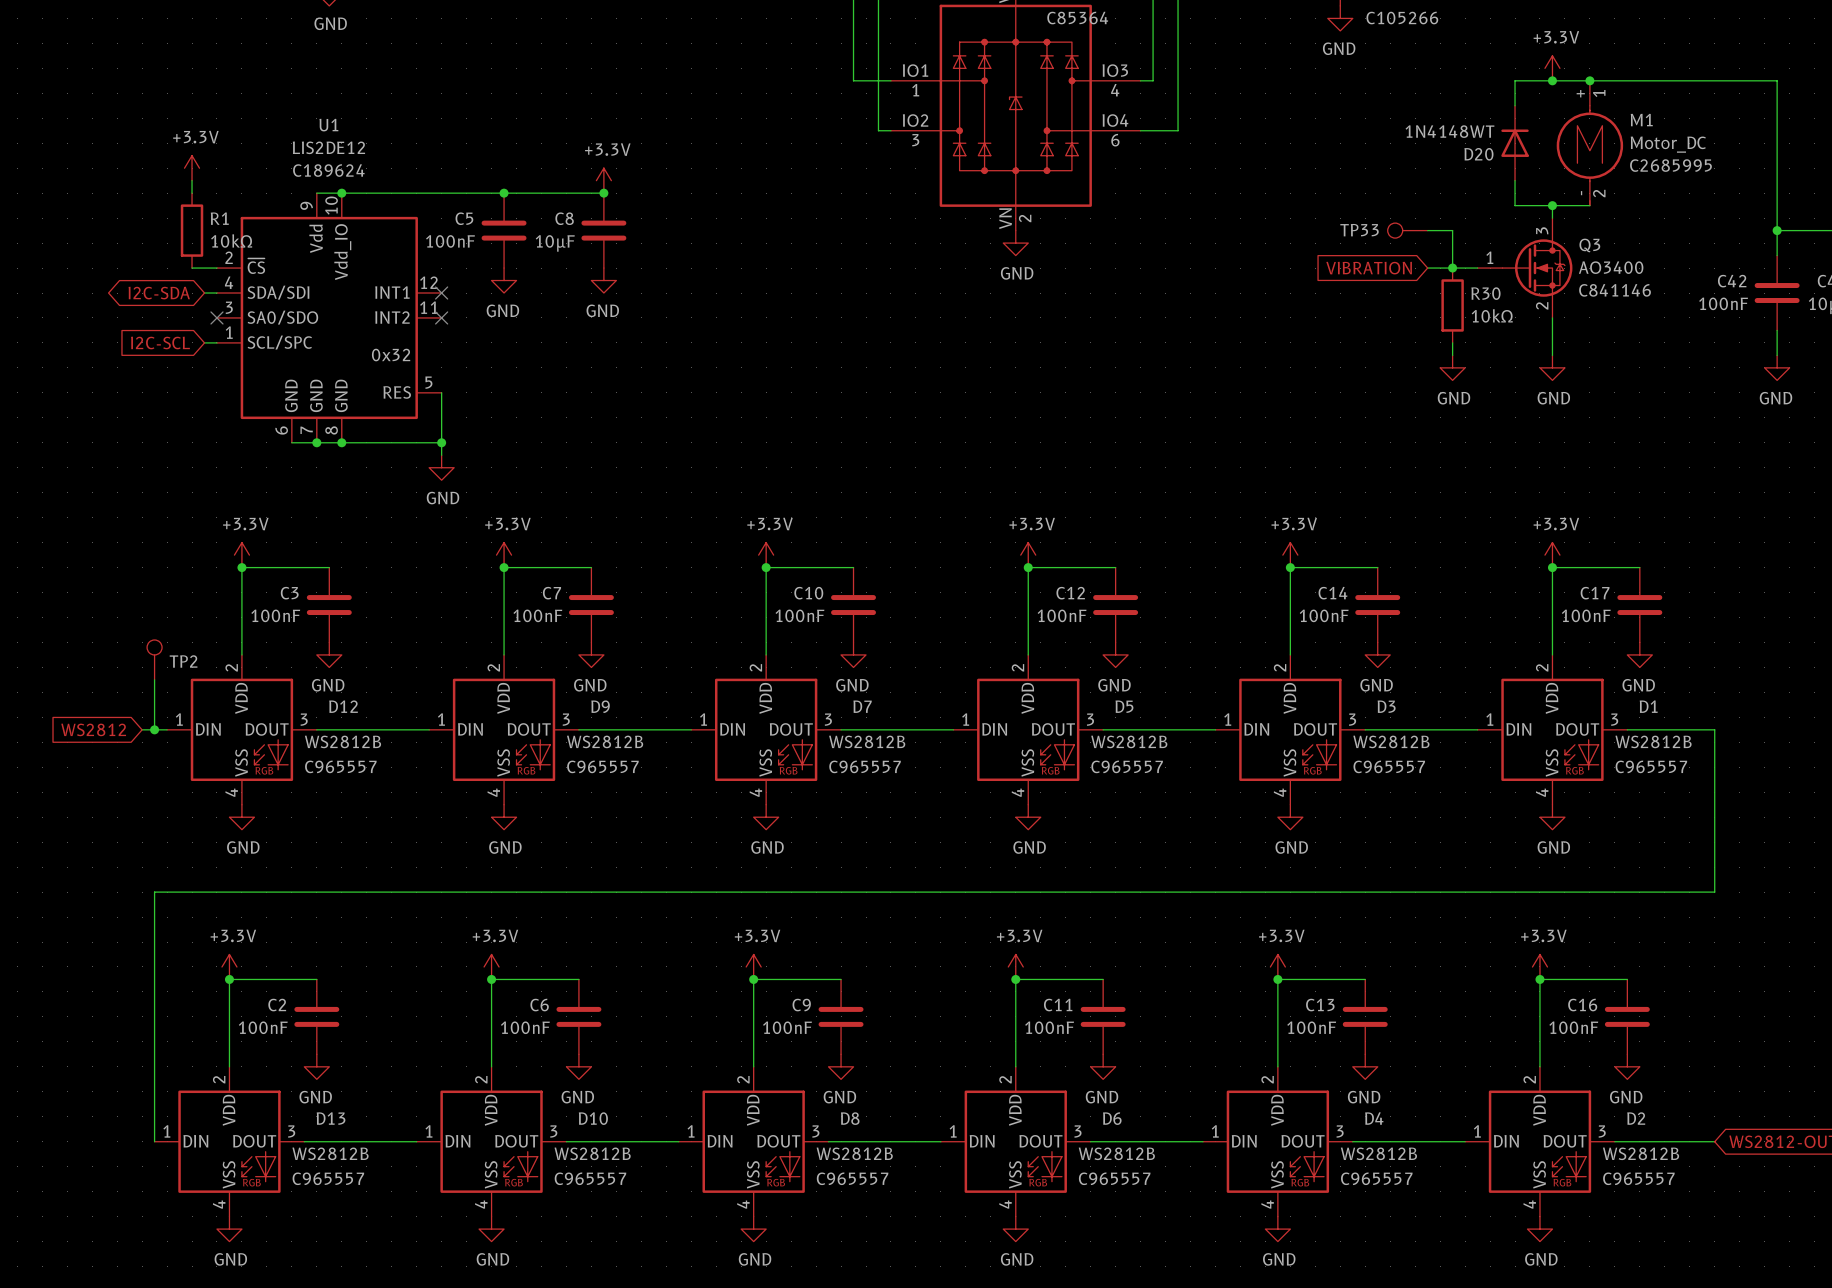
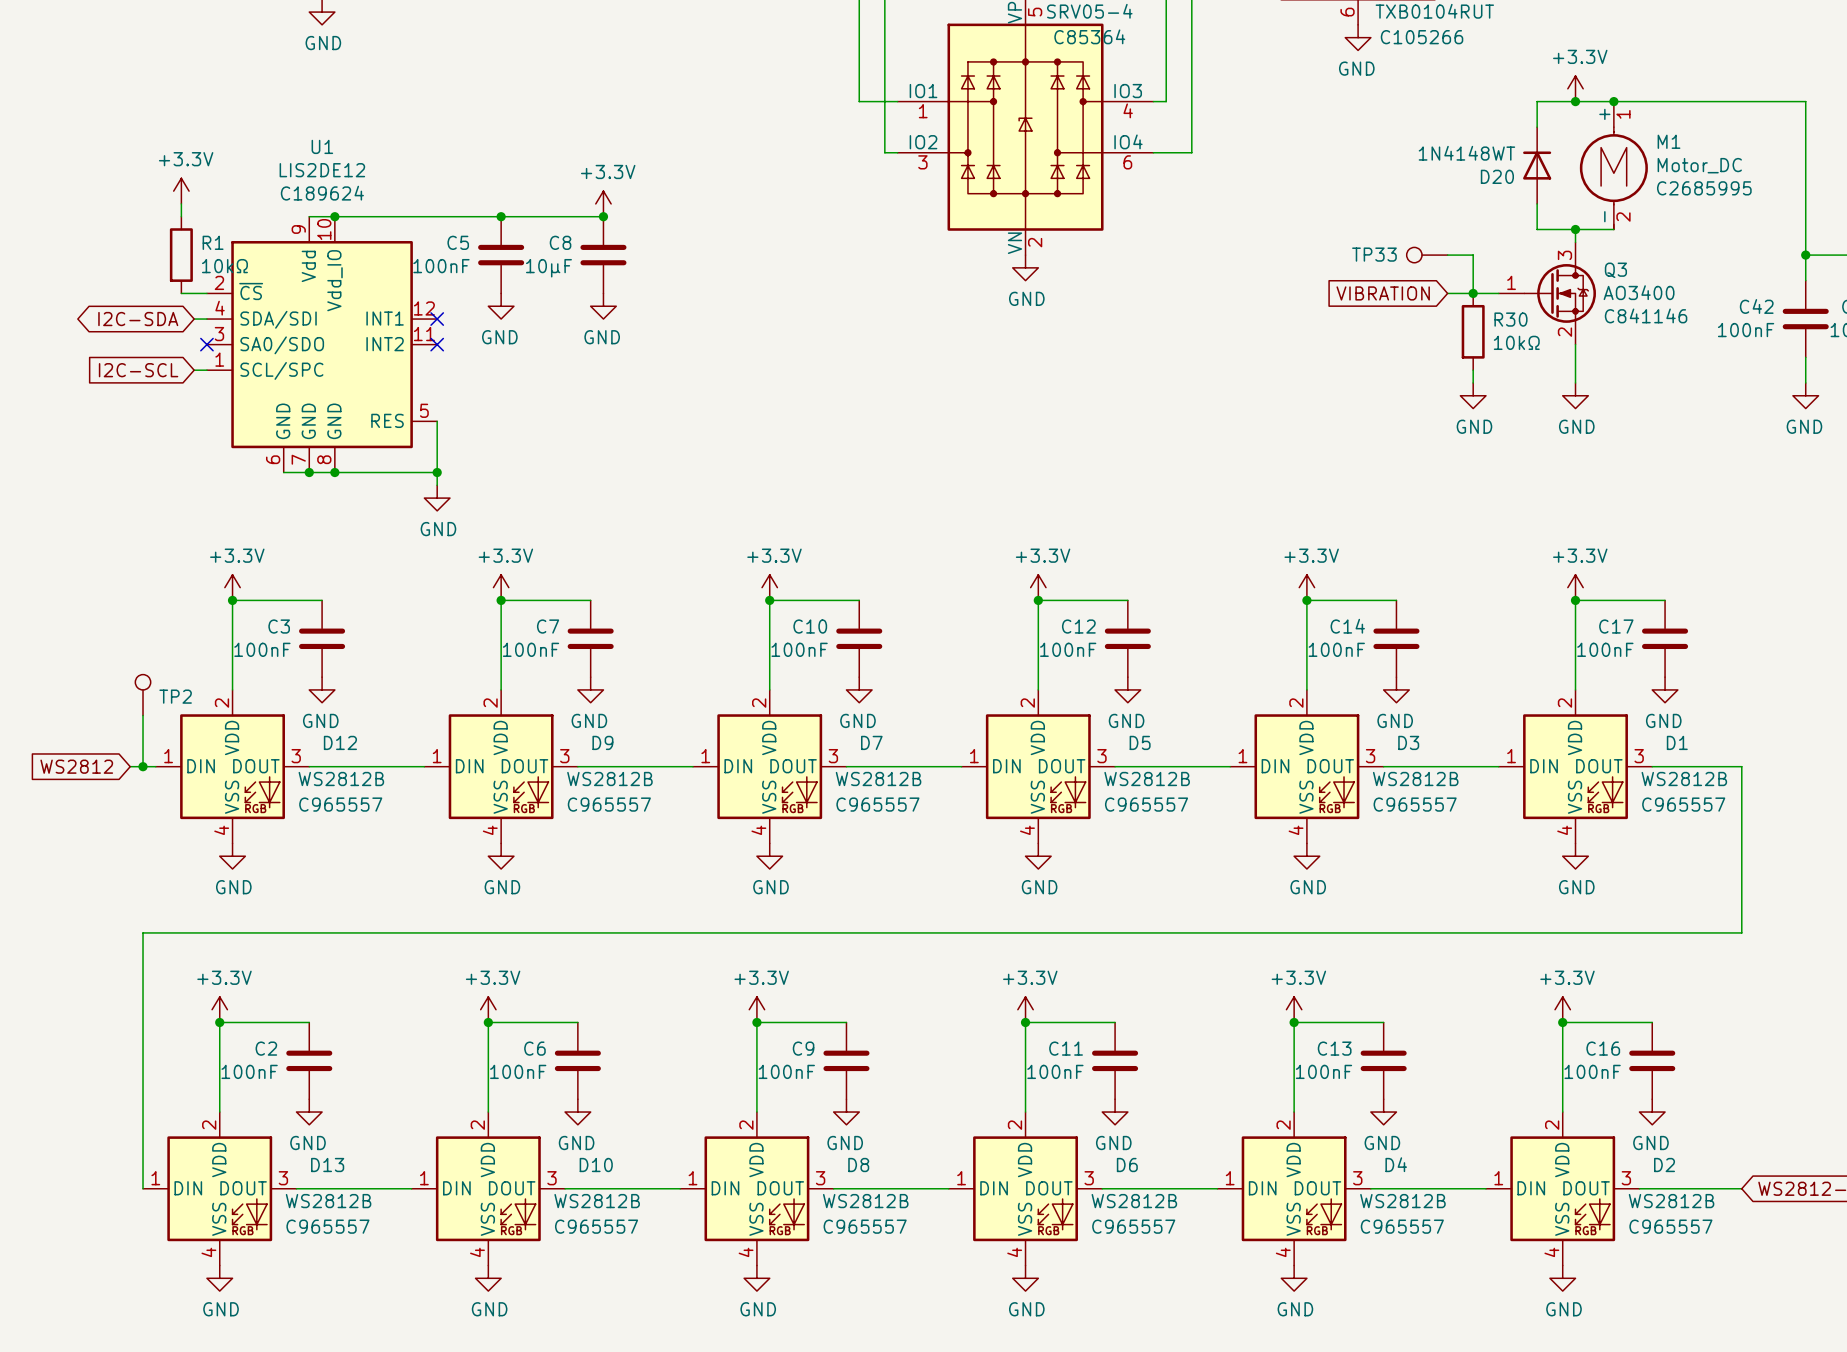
U1 text: 0x32 (391, 355) -> none

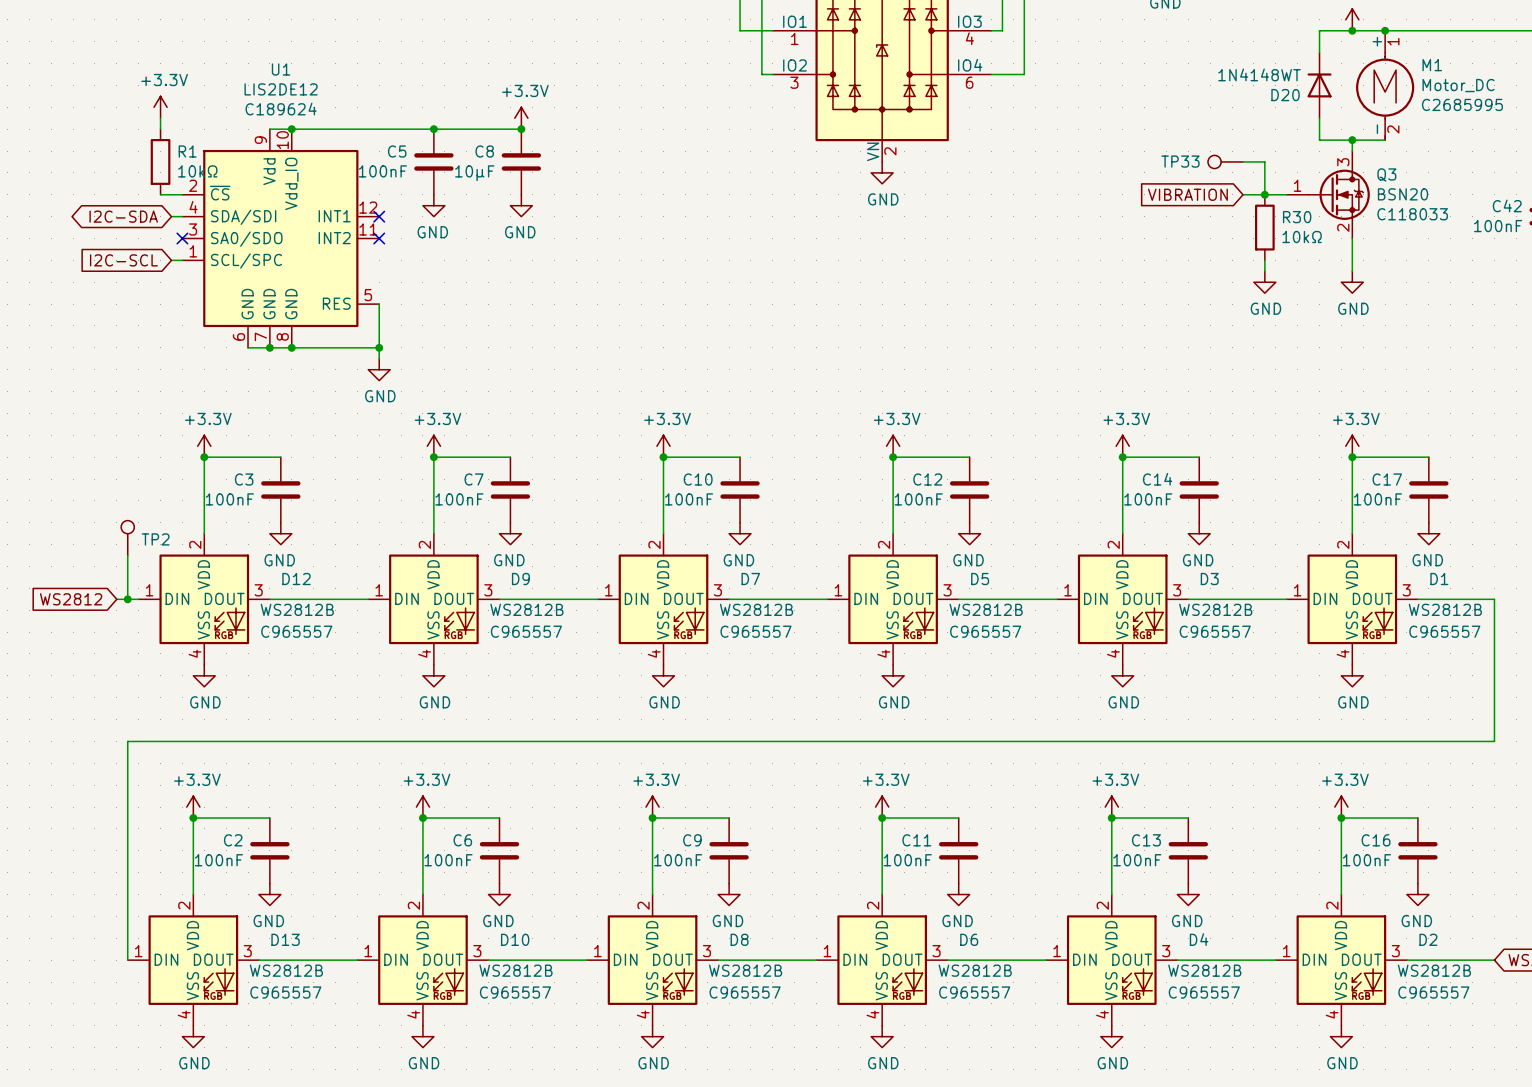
Q3 value: AO3400 (1639, 292) -> BSN20 (1403, 194)
Q3 text: C841146 (1646, 315) -> C118033 (1412, 214)

